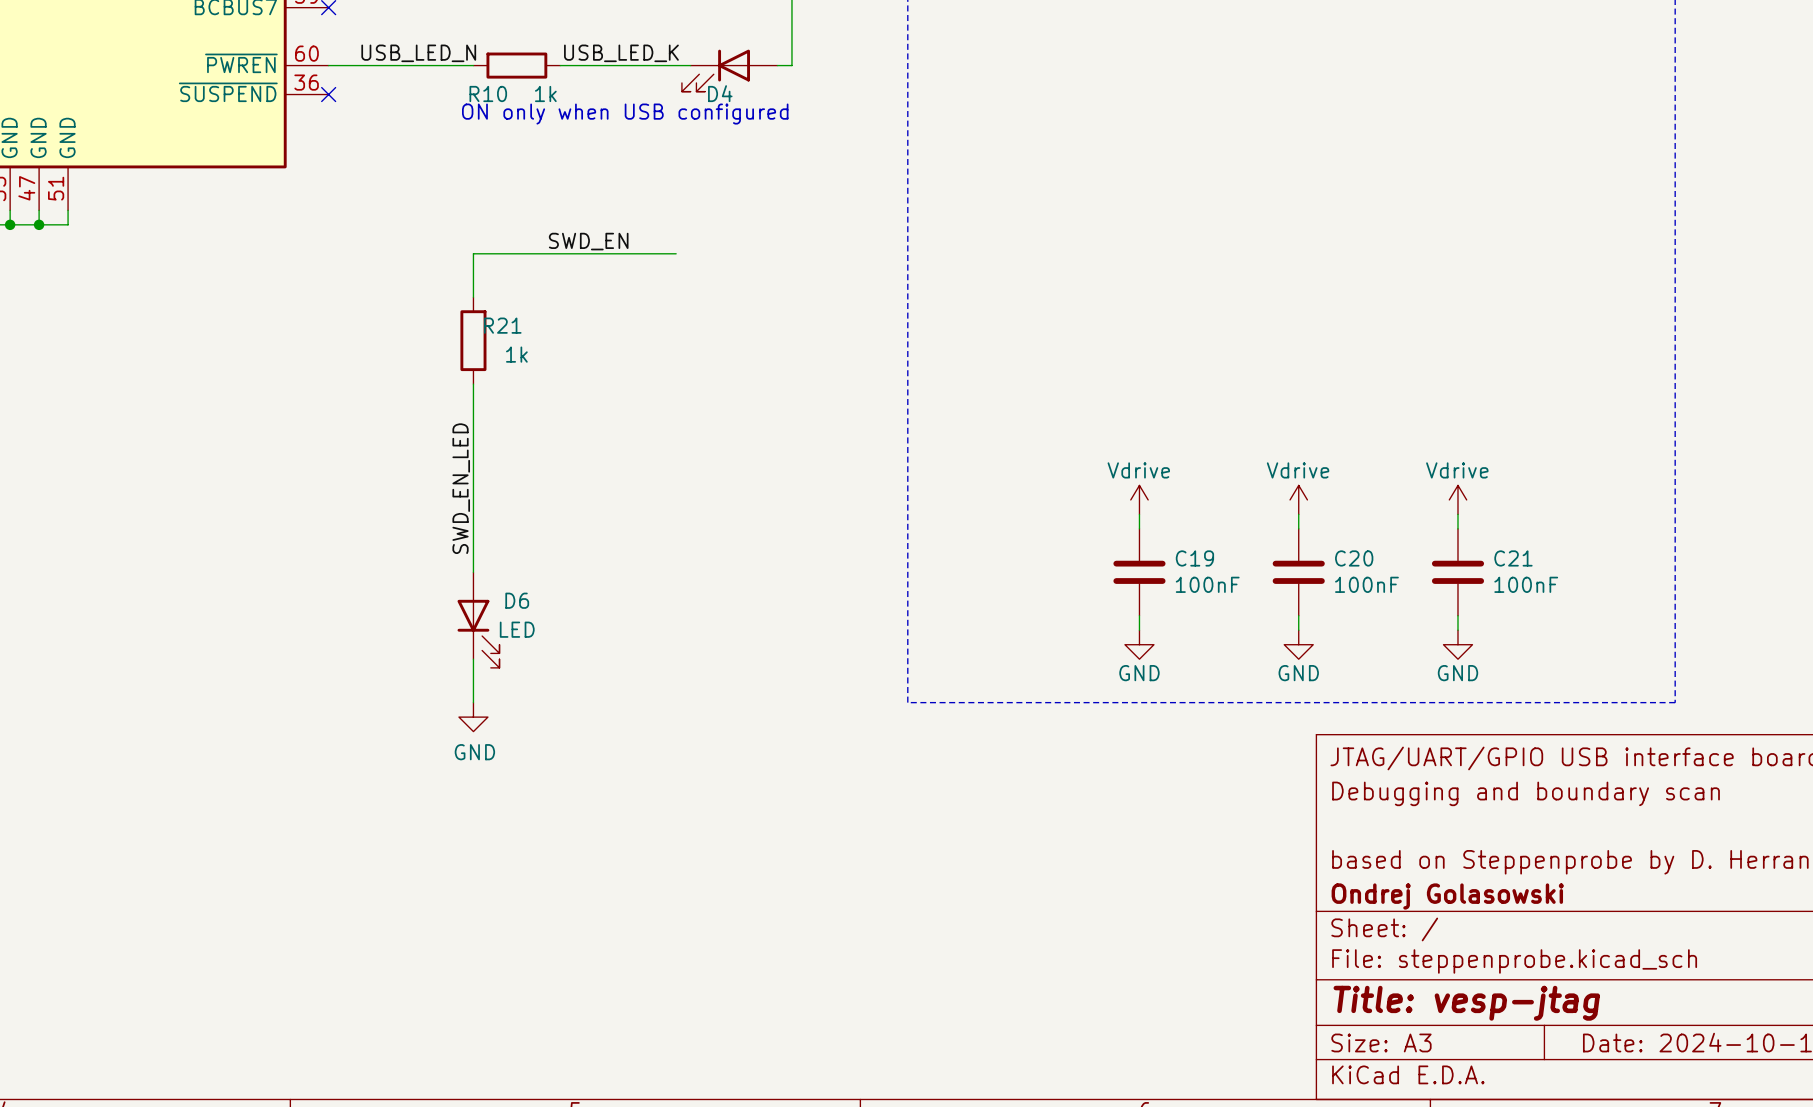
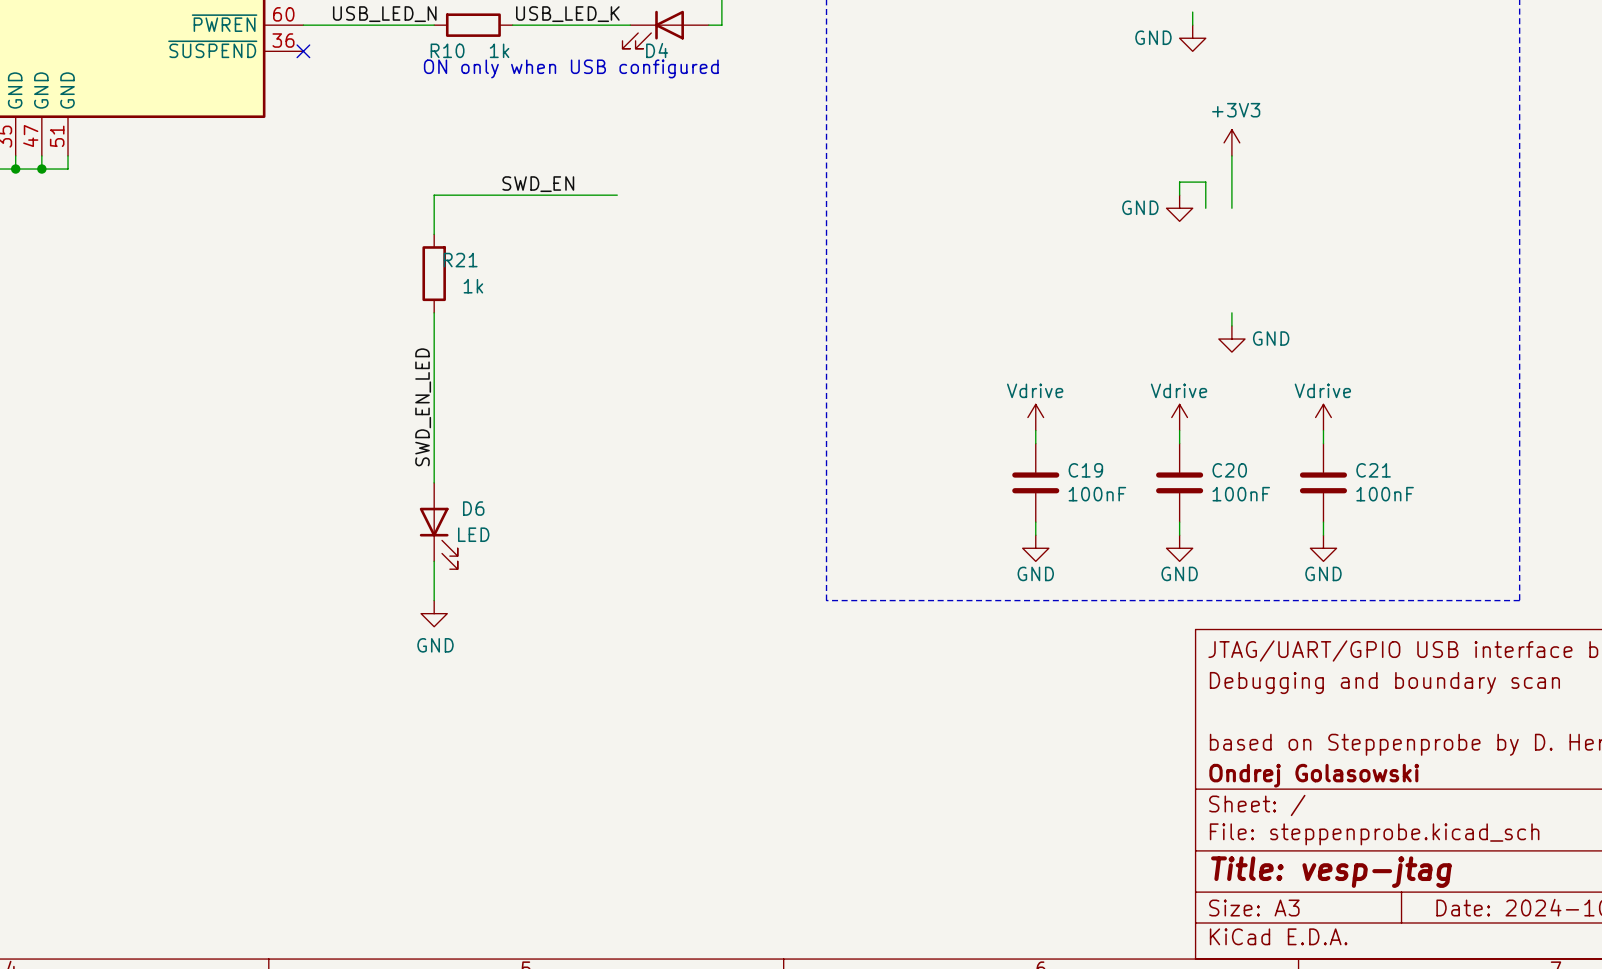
wire: none -> (1192, 12) (1192, 25)
power symbol: none -> GND (1192, 38)
power symbol: none -> +3V3 (1231, 142)
wire: none -> (1231, 155) (1231, 208)
wire: none -> (1179, 195) (1179, 182) (1205, 182) (1205, 208)
power symbol: none -> GND (1179, 208)
wire: none -> (1231, 312) (1231, 325)
power symbol: none -> GND (1231, 339)

